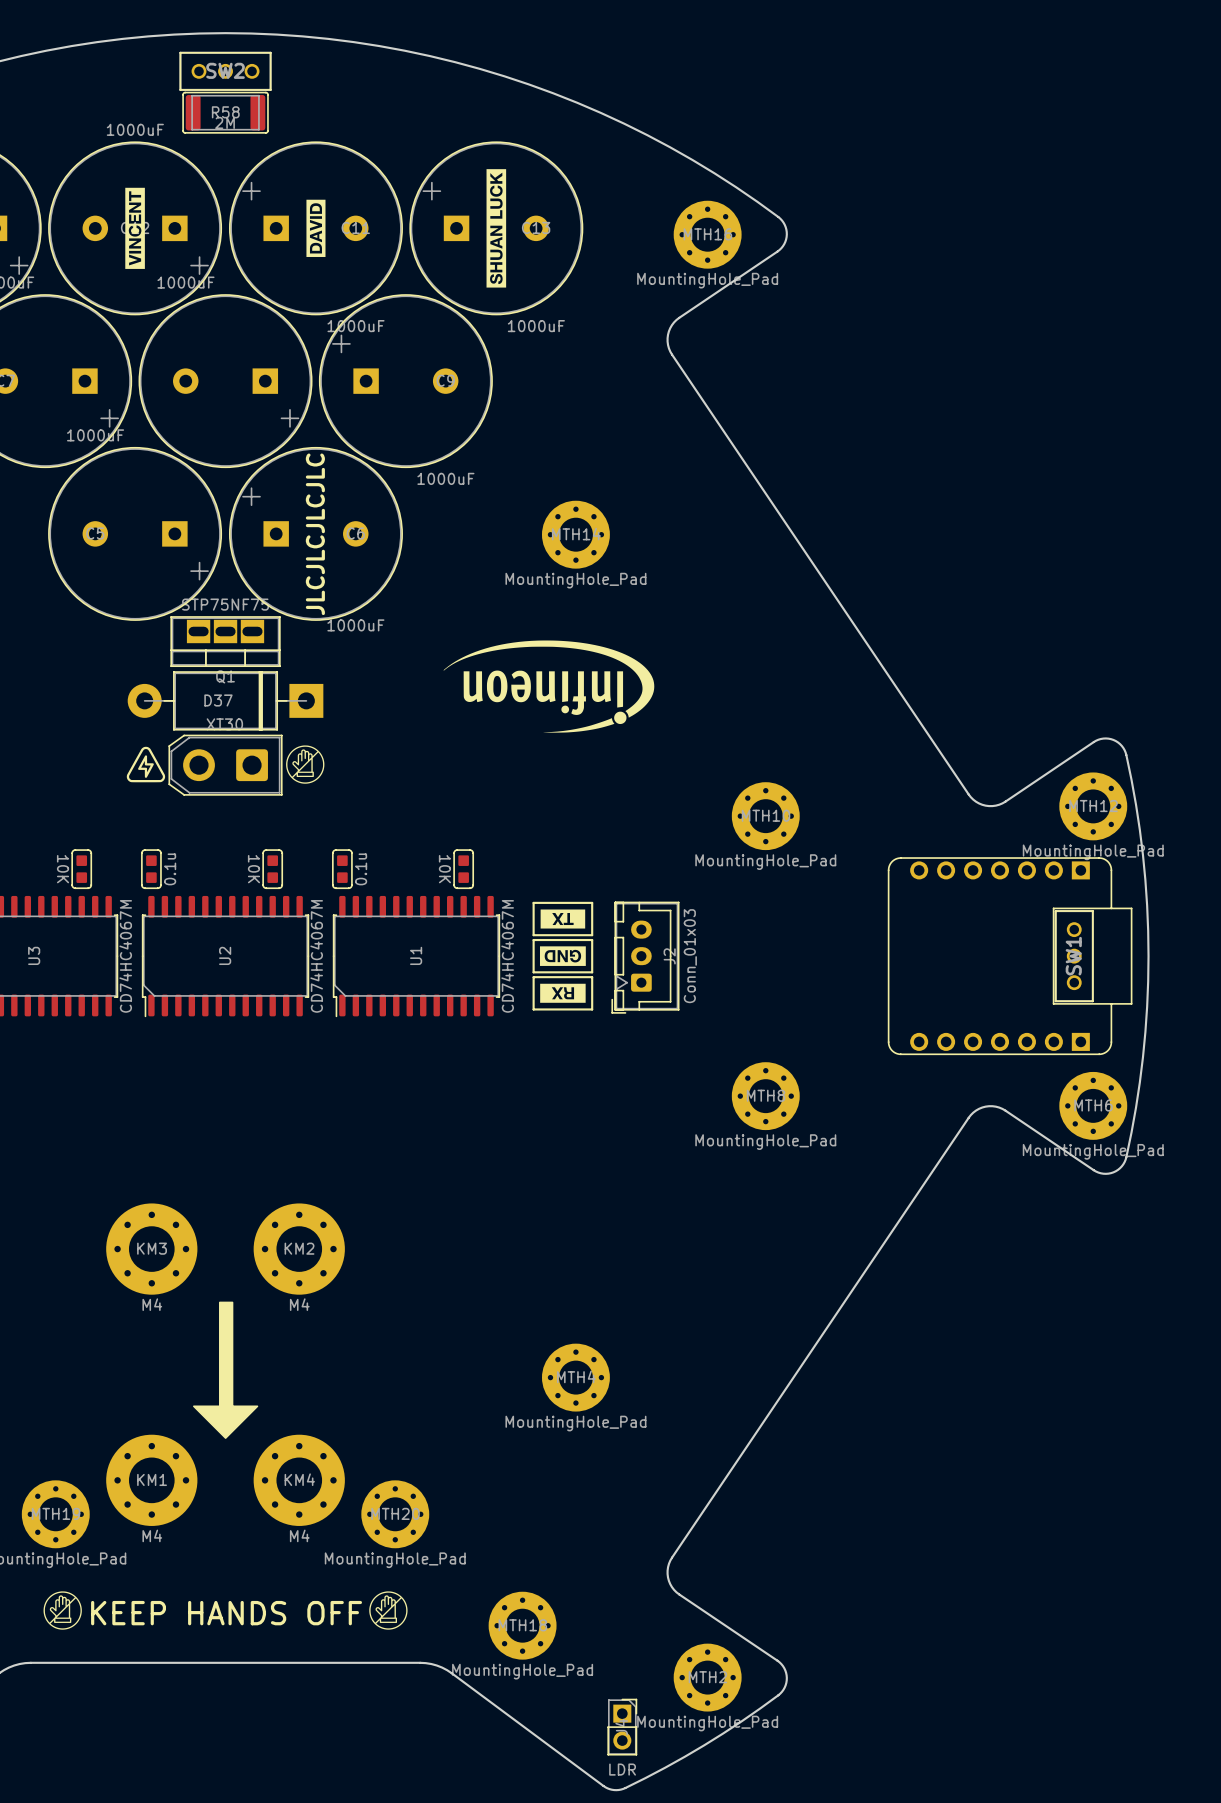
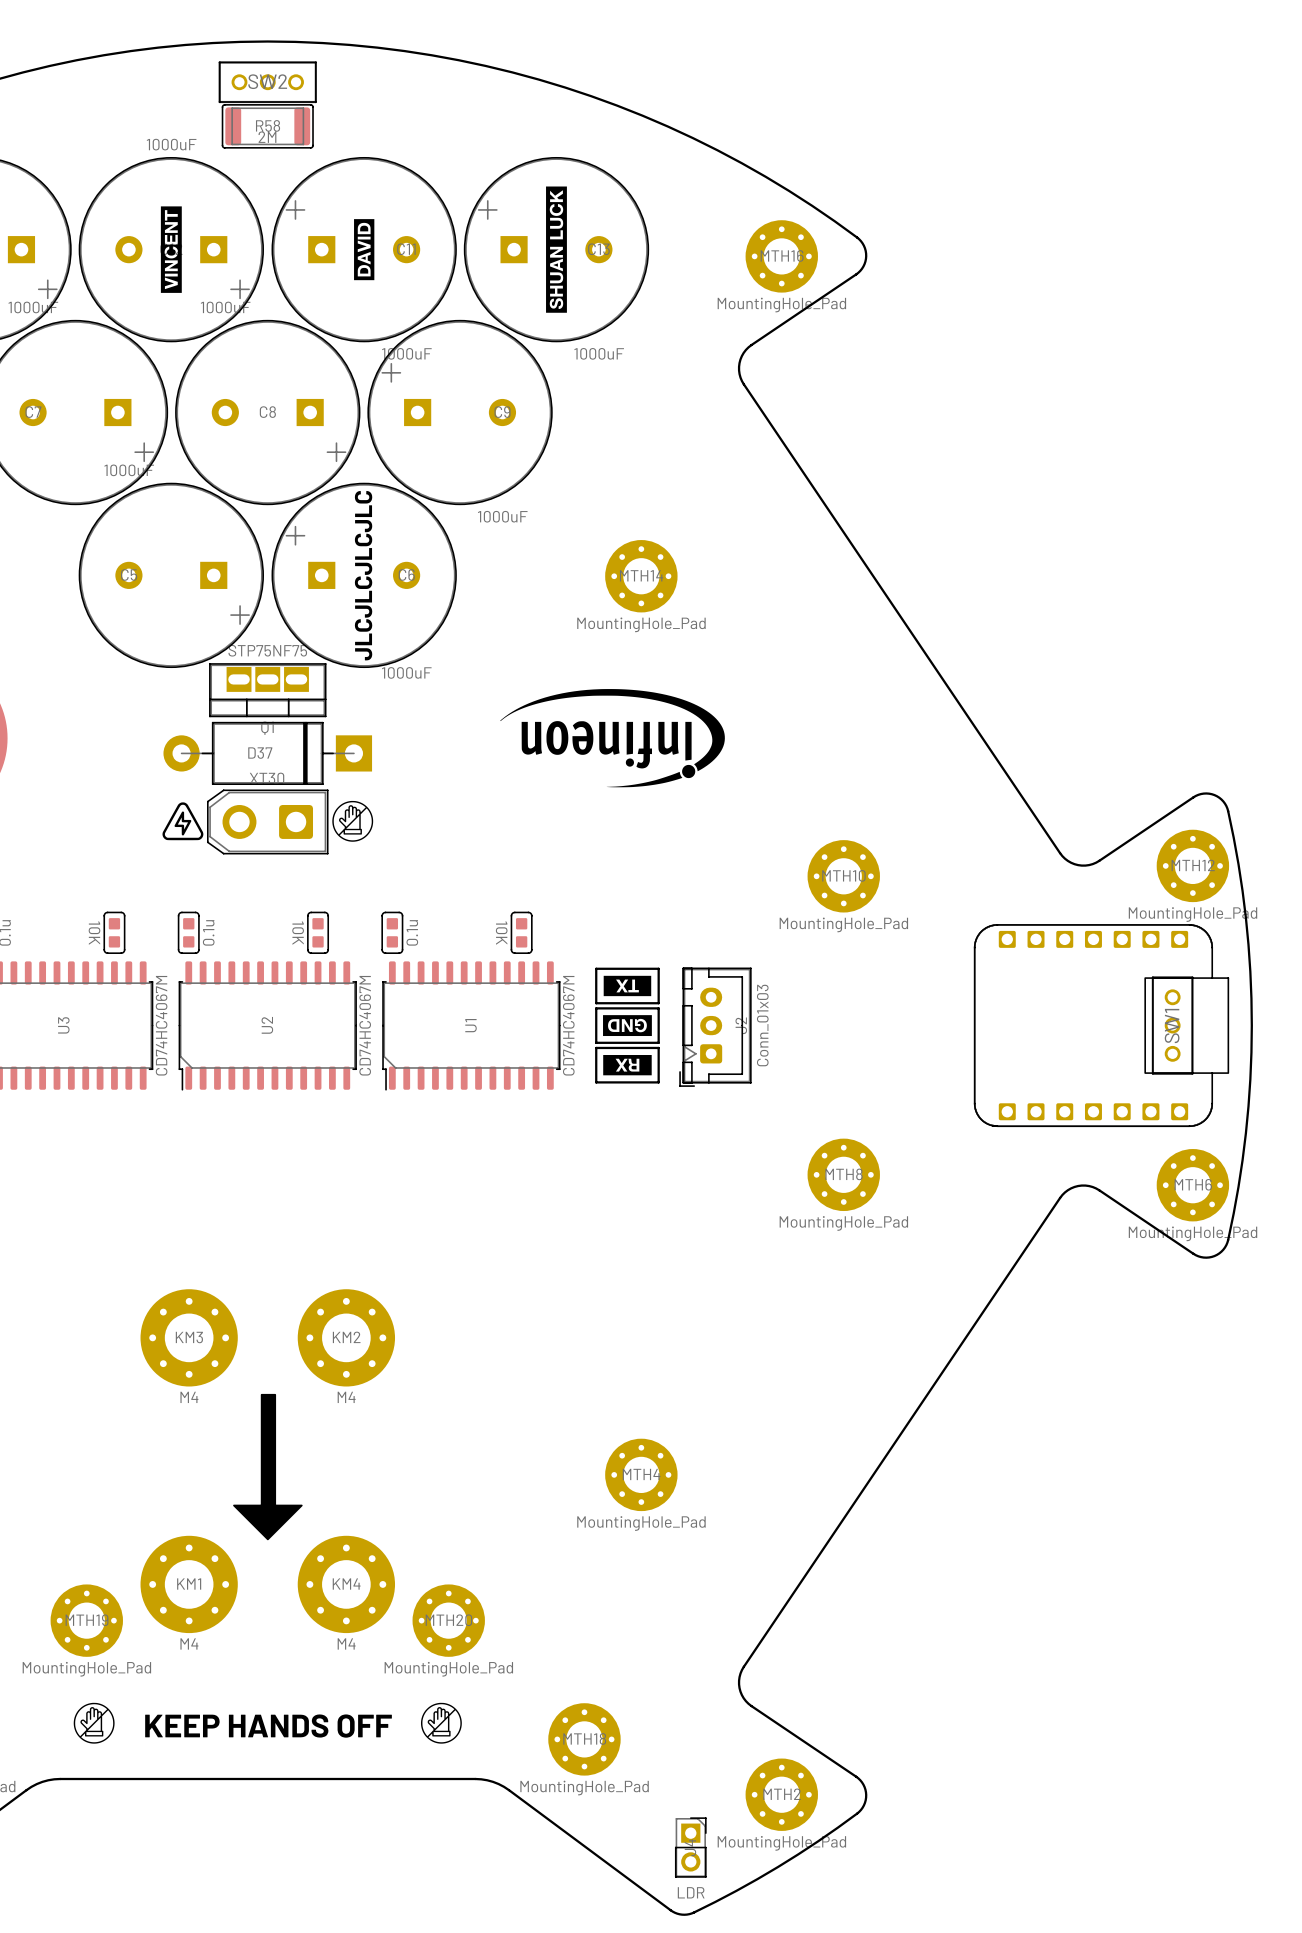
C8 name: none -> C8 (267, 412)
part footprint: [888, 857, 1133, 1055] -> [974, 924, 1229, 1127]

